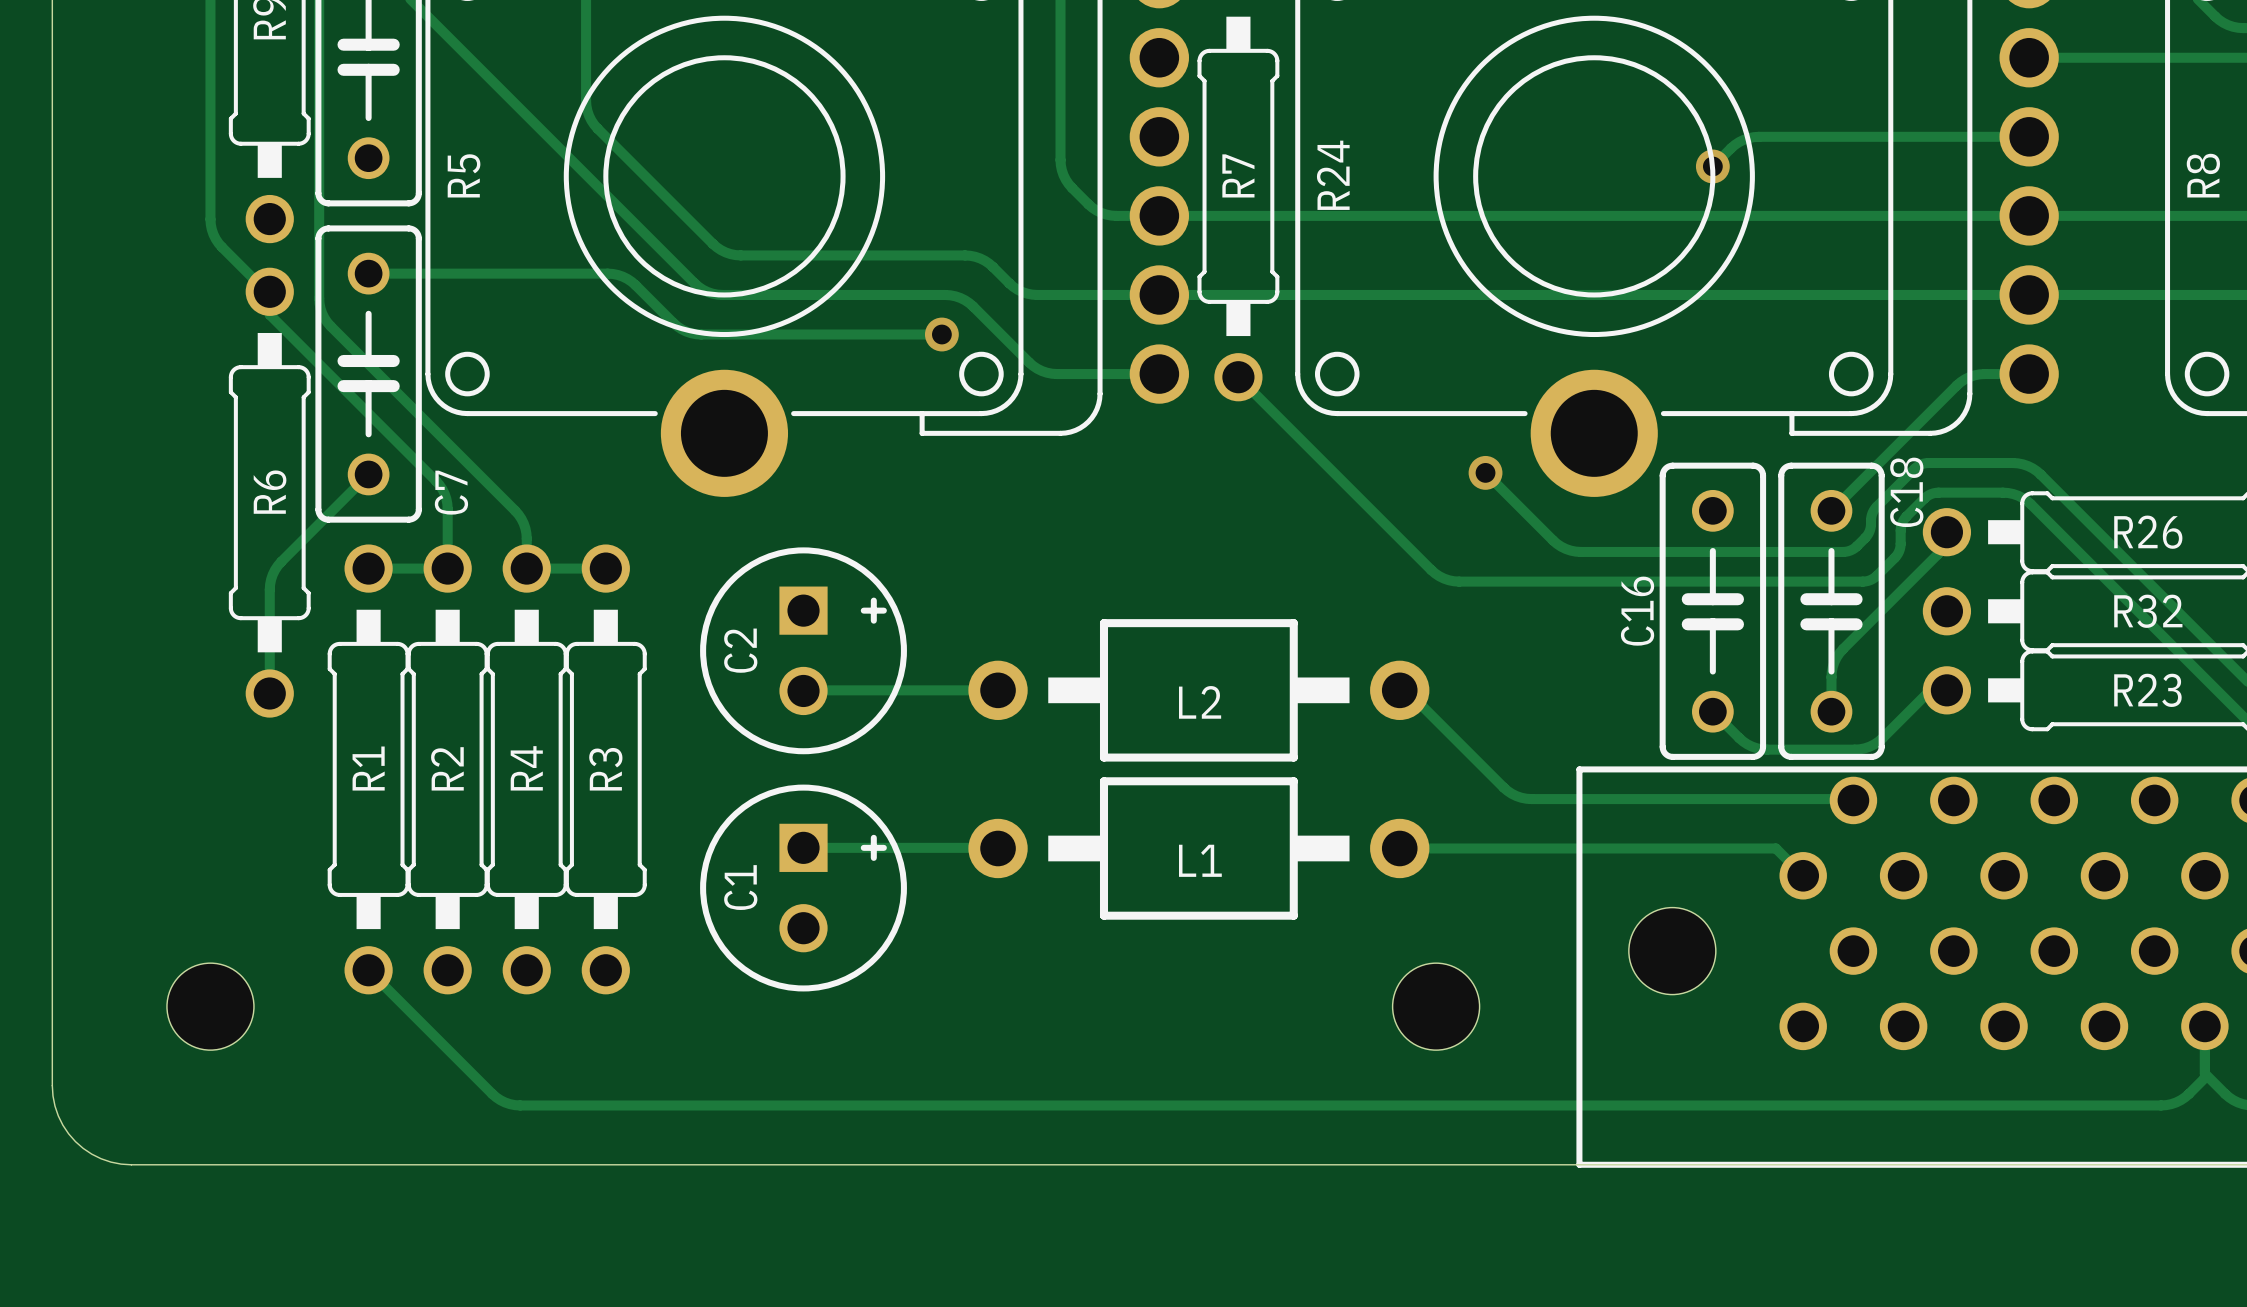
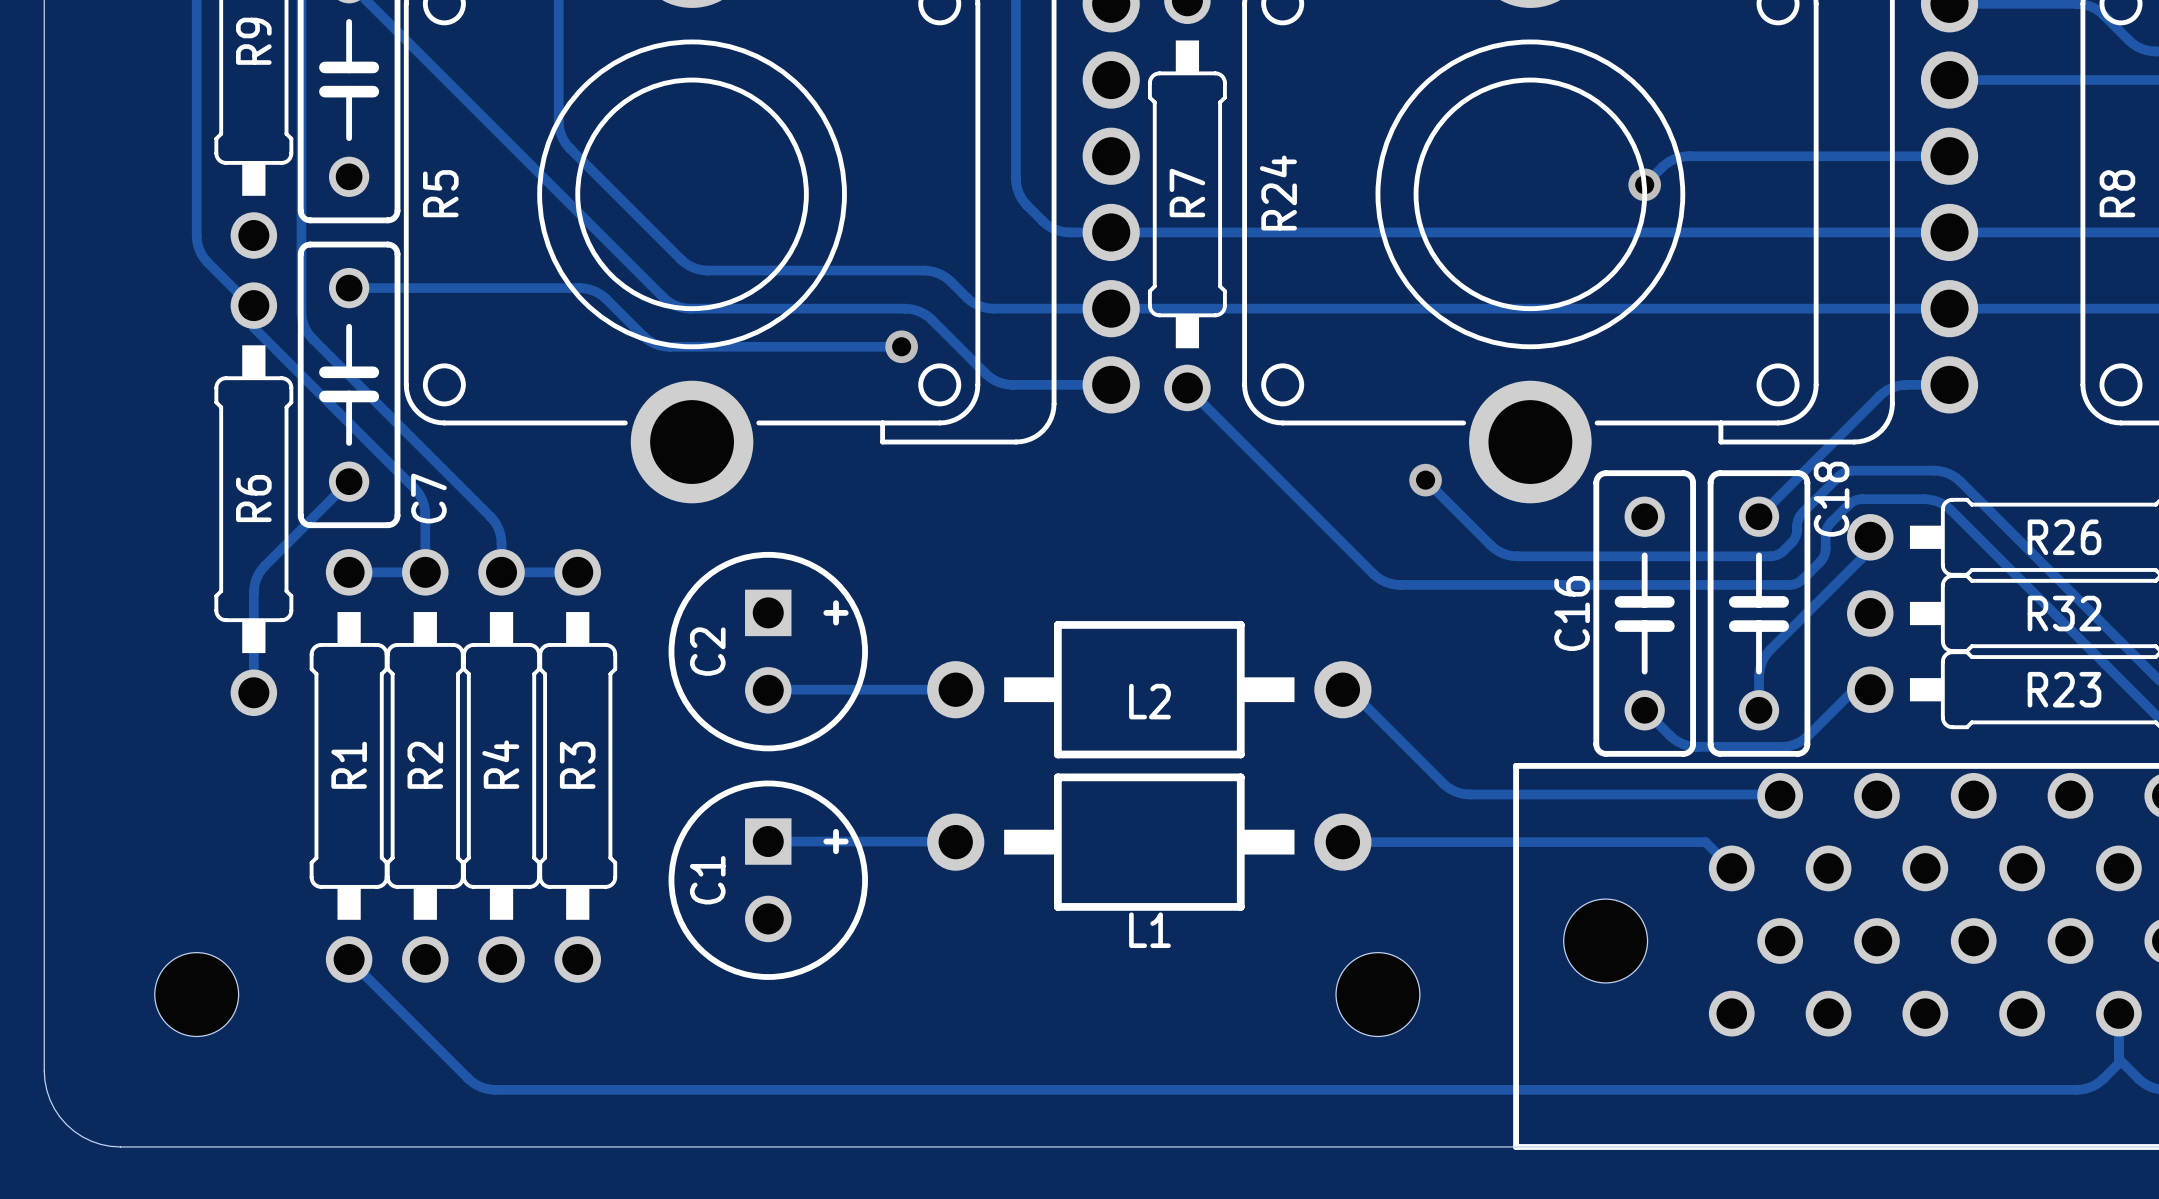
L1 name position: L1 (1200, 860) -> L1 (1149, 930)

